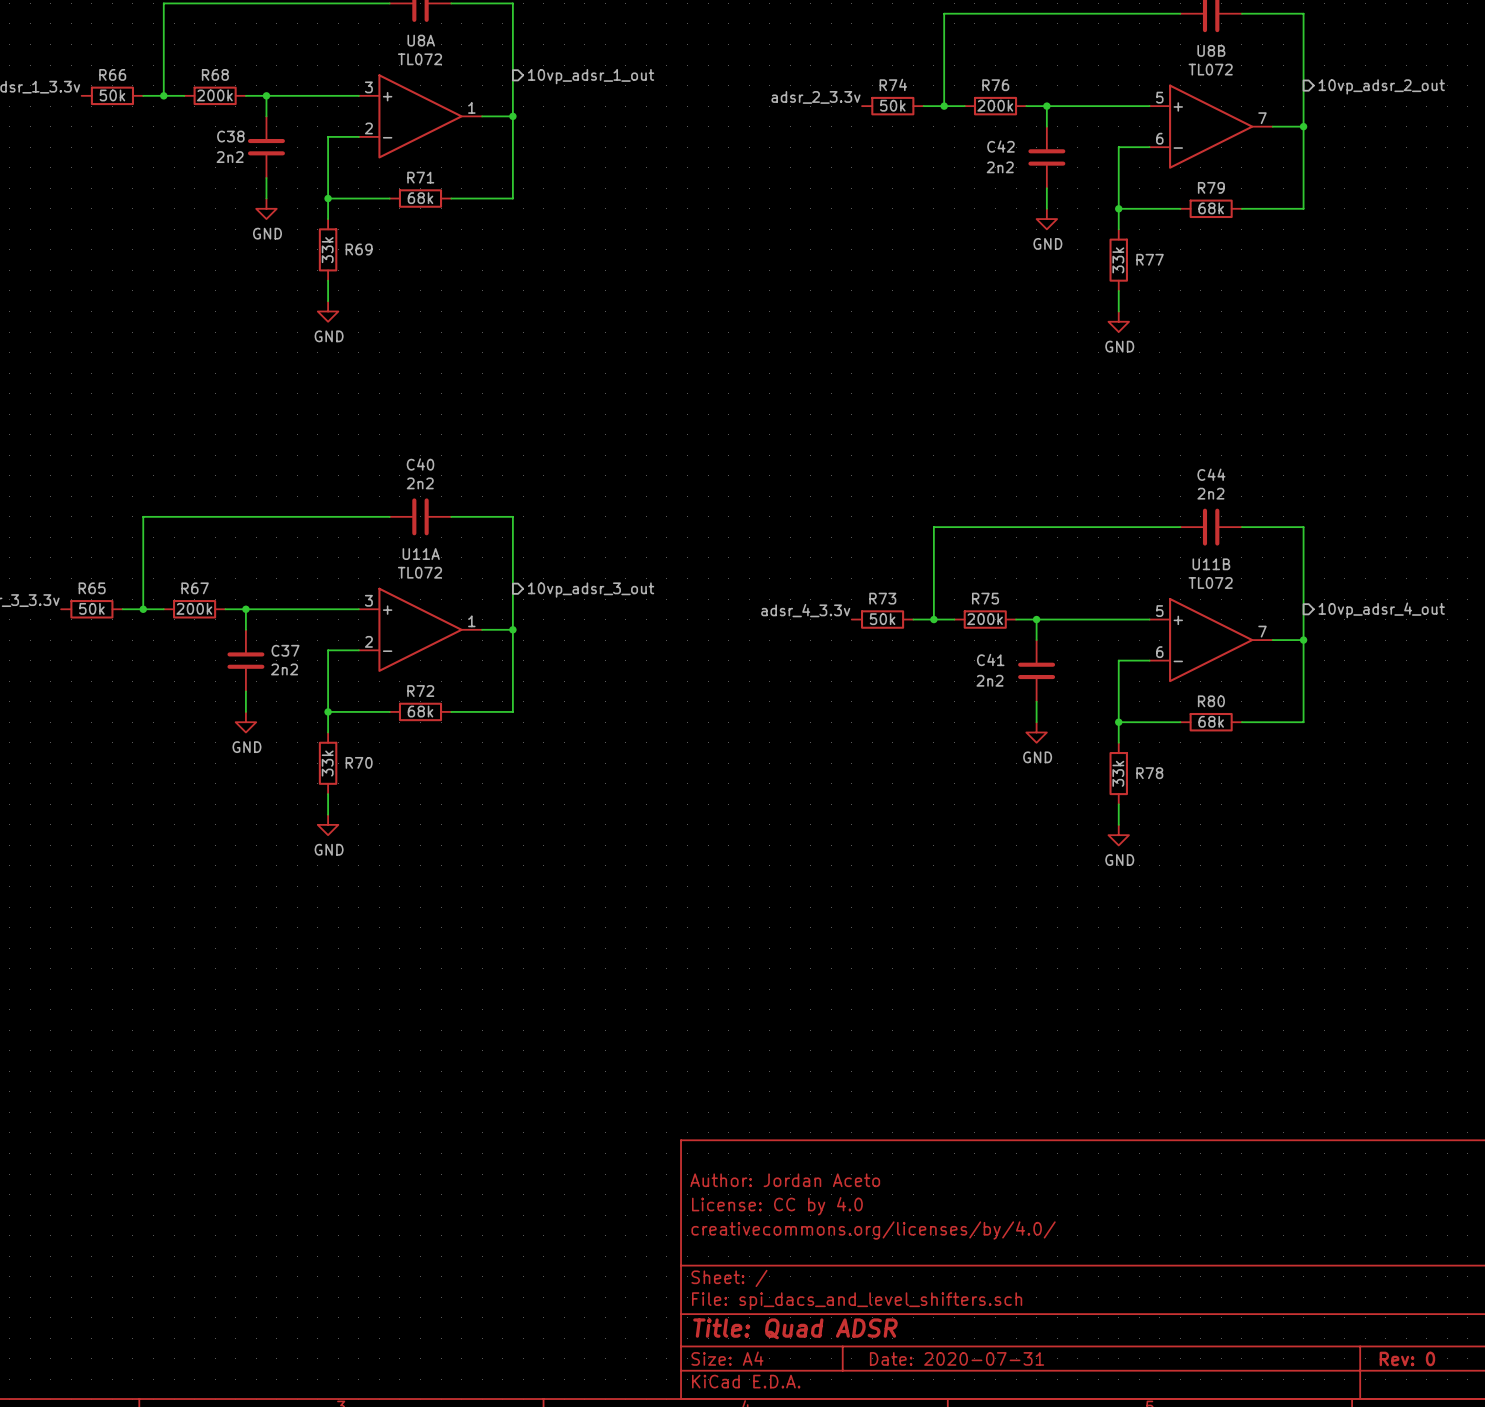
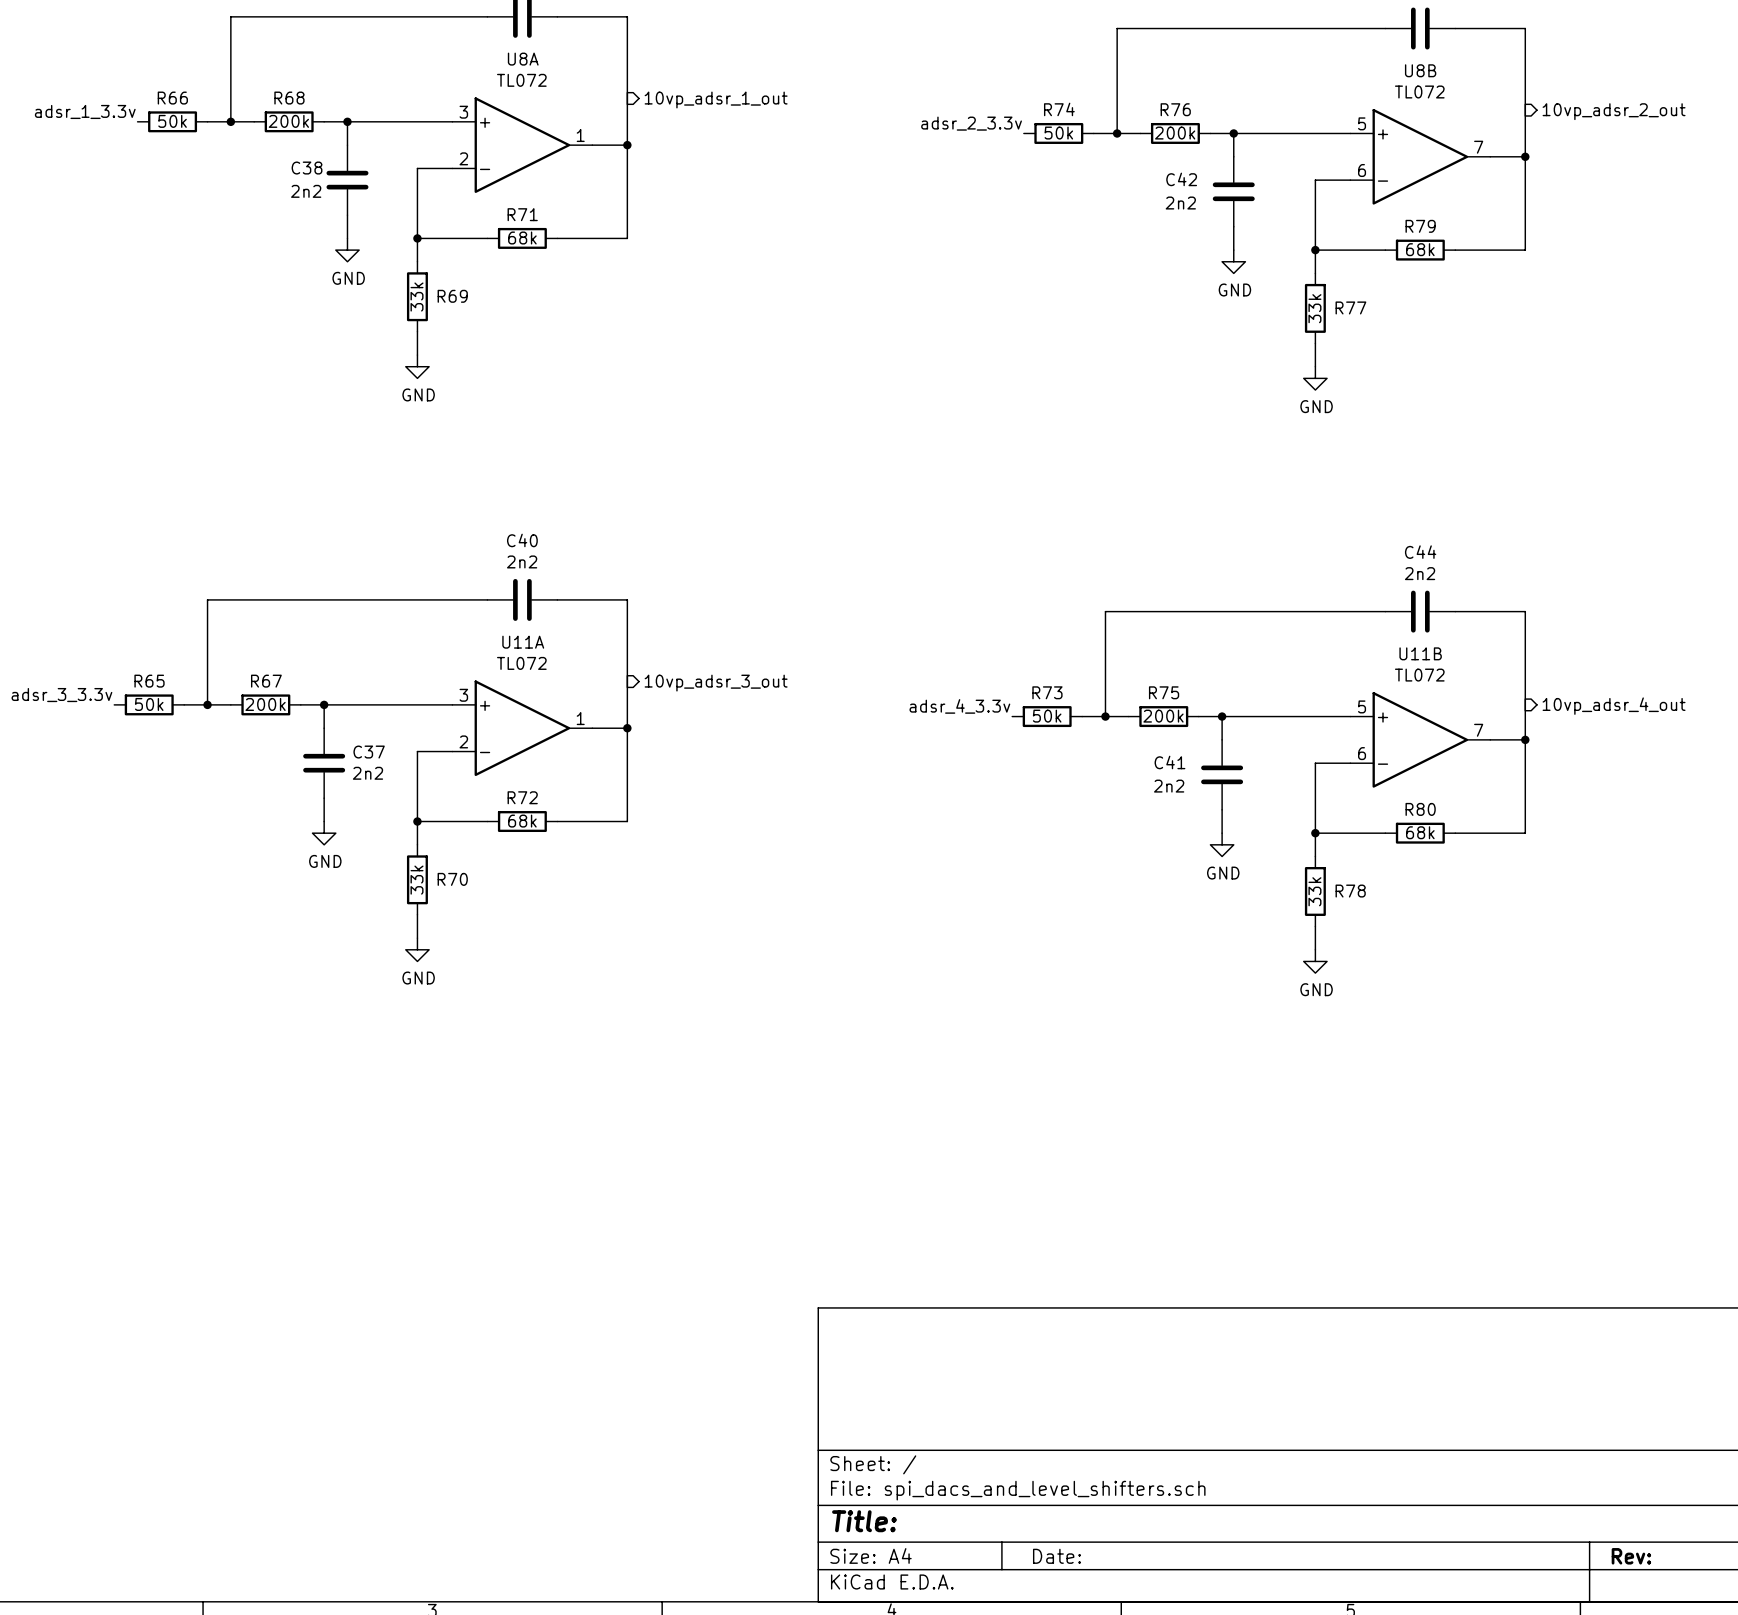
title block: Author: Jordan Aceto (785, 1180) -> none
title block: License: CC by 4.0 (777, 1206) -> none
title block: creativecommons.org/licenses/by/4.0/ (873, 1230) -> none
title block: Title: Quad ADSR (795, 1328) -> Title: (864, 1521)
title block: Date: 2020-07-31 (957, 1358) -> Date: (1056, 1556)
title block: Rev: 0 (1407, 1358) -> Rev: (1631, 1556)

